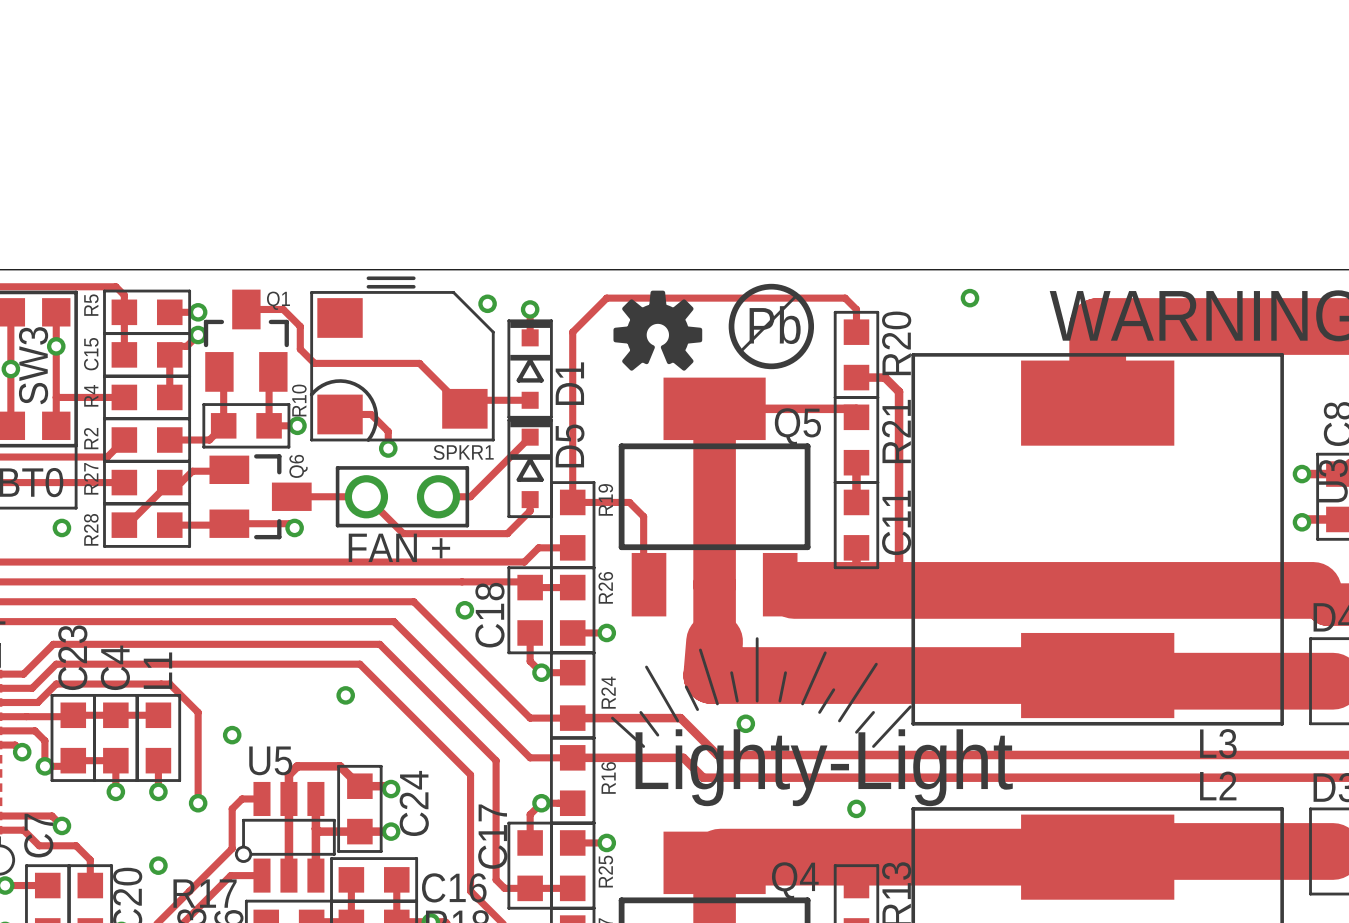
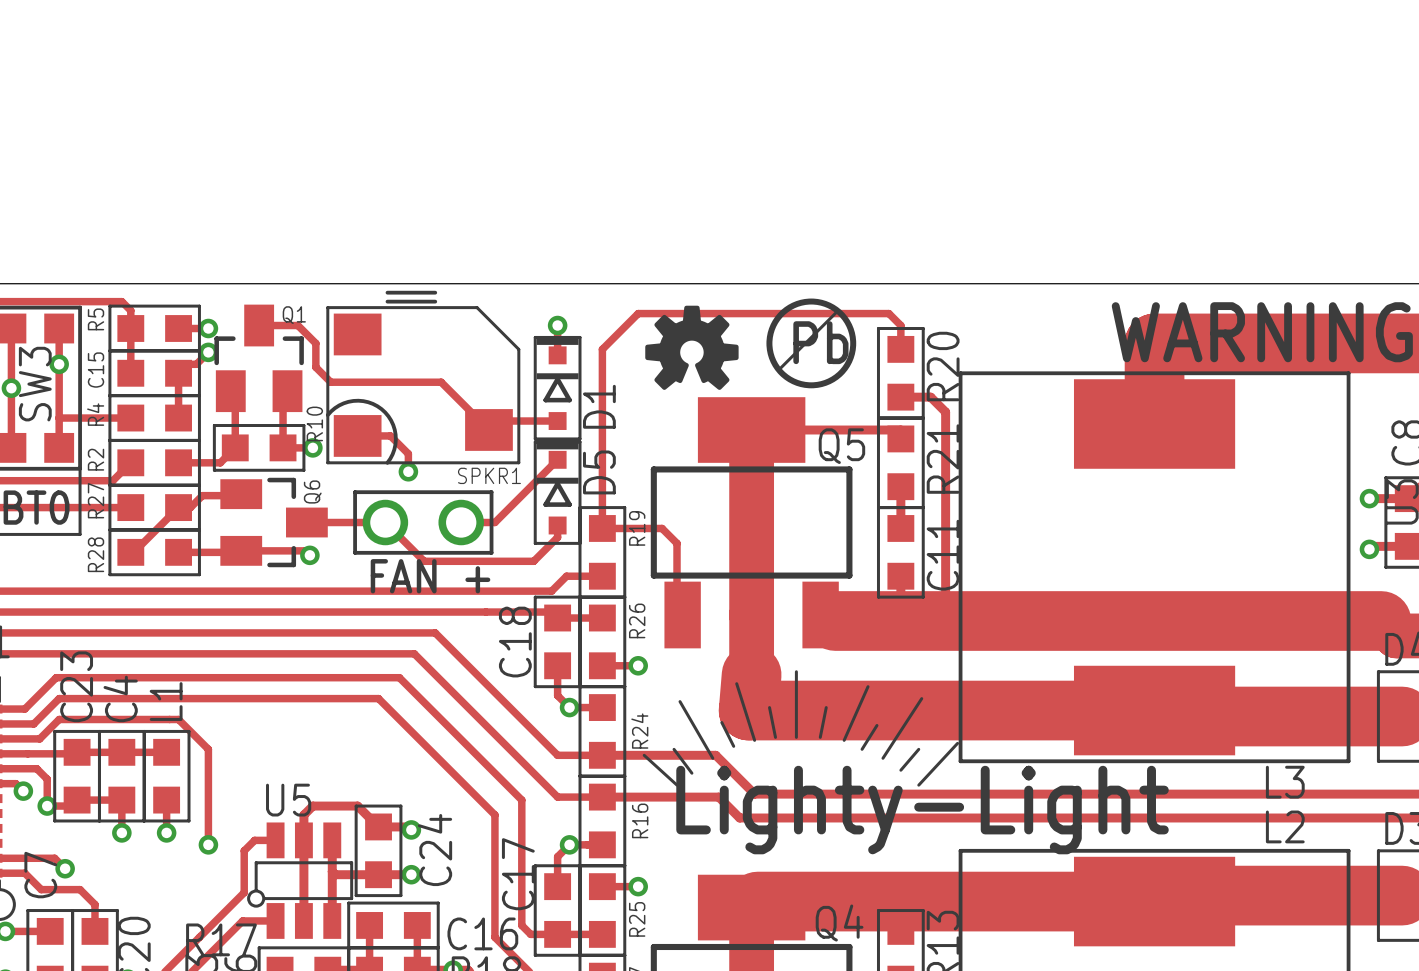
via: (969, 298) -> none
via: (487, 303) -> none
via: (61, 527) -> none
via: (464, 610) -> none
via: (345, 695) -> none
via: (745, 723) -> none
via: (232, 735) -> none
via: (856, 808) -> none
via: (158, 865) -> none

